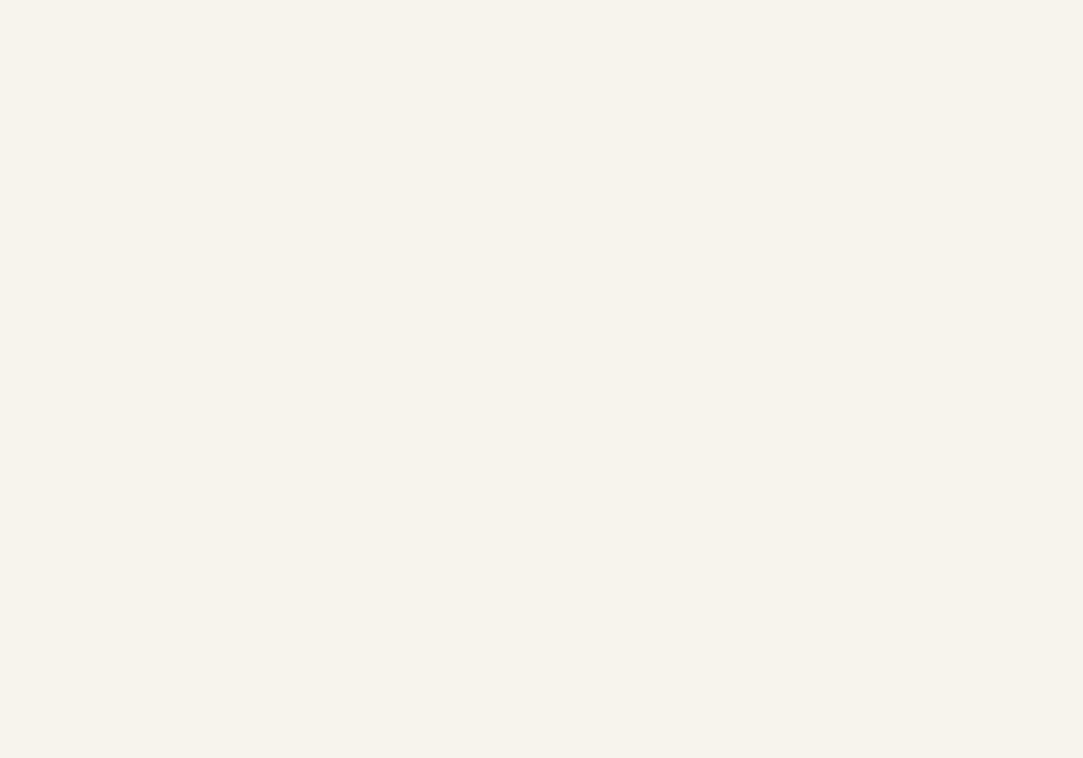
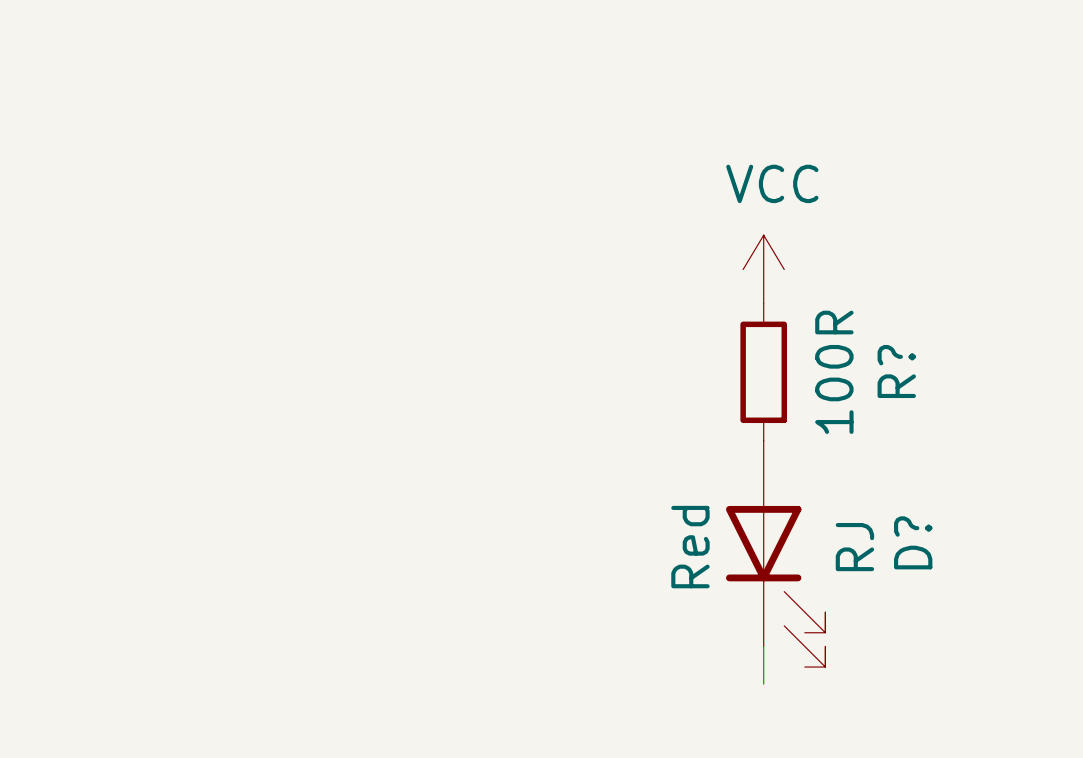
power symbol: none -> VCC (763, 269)
R?: none -> 100R (763, 372)
D?: none -> RJ (775, 553)
wire: none -> (763, 646) (763, 684)

